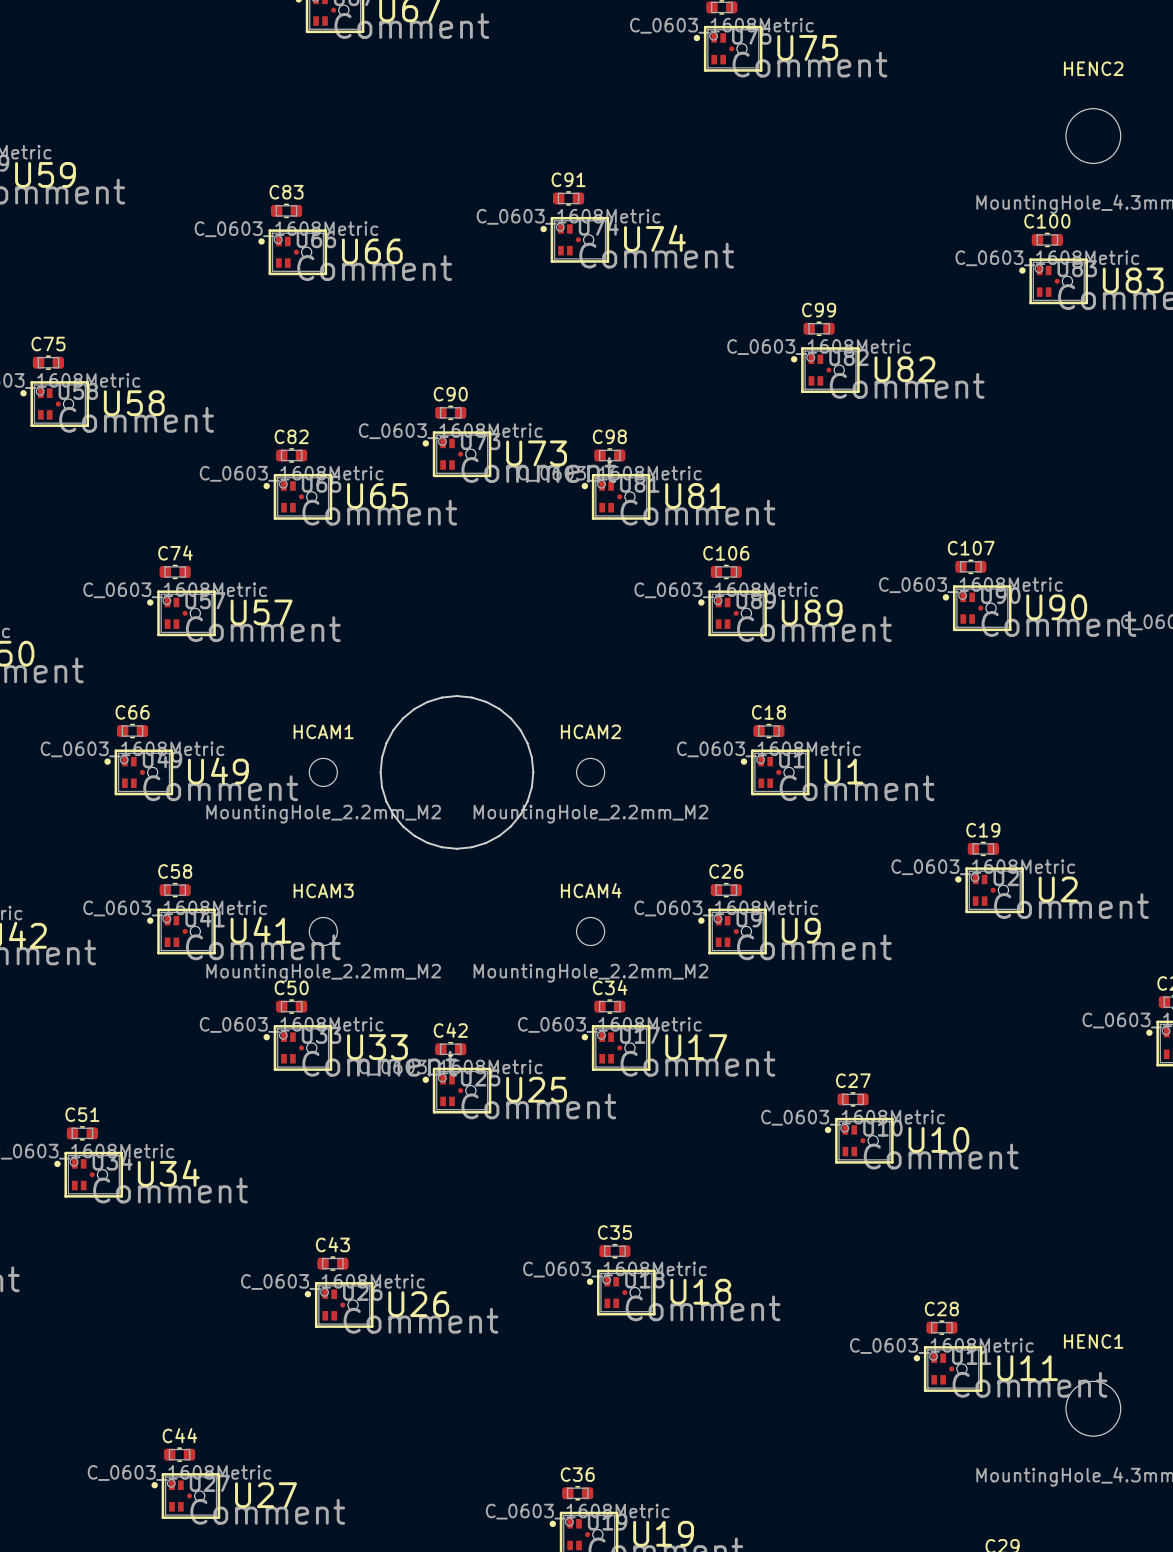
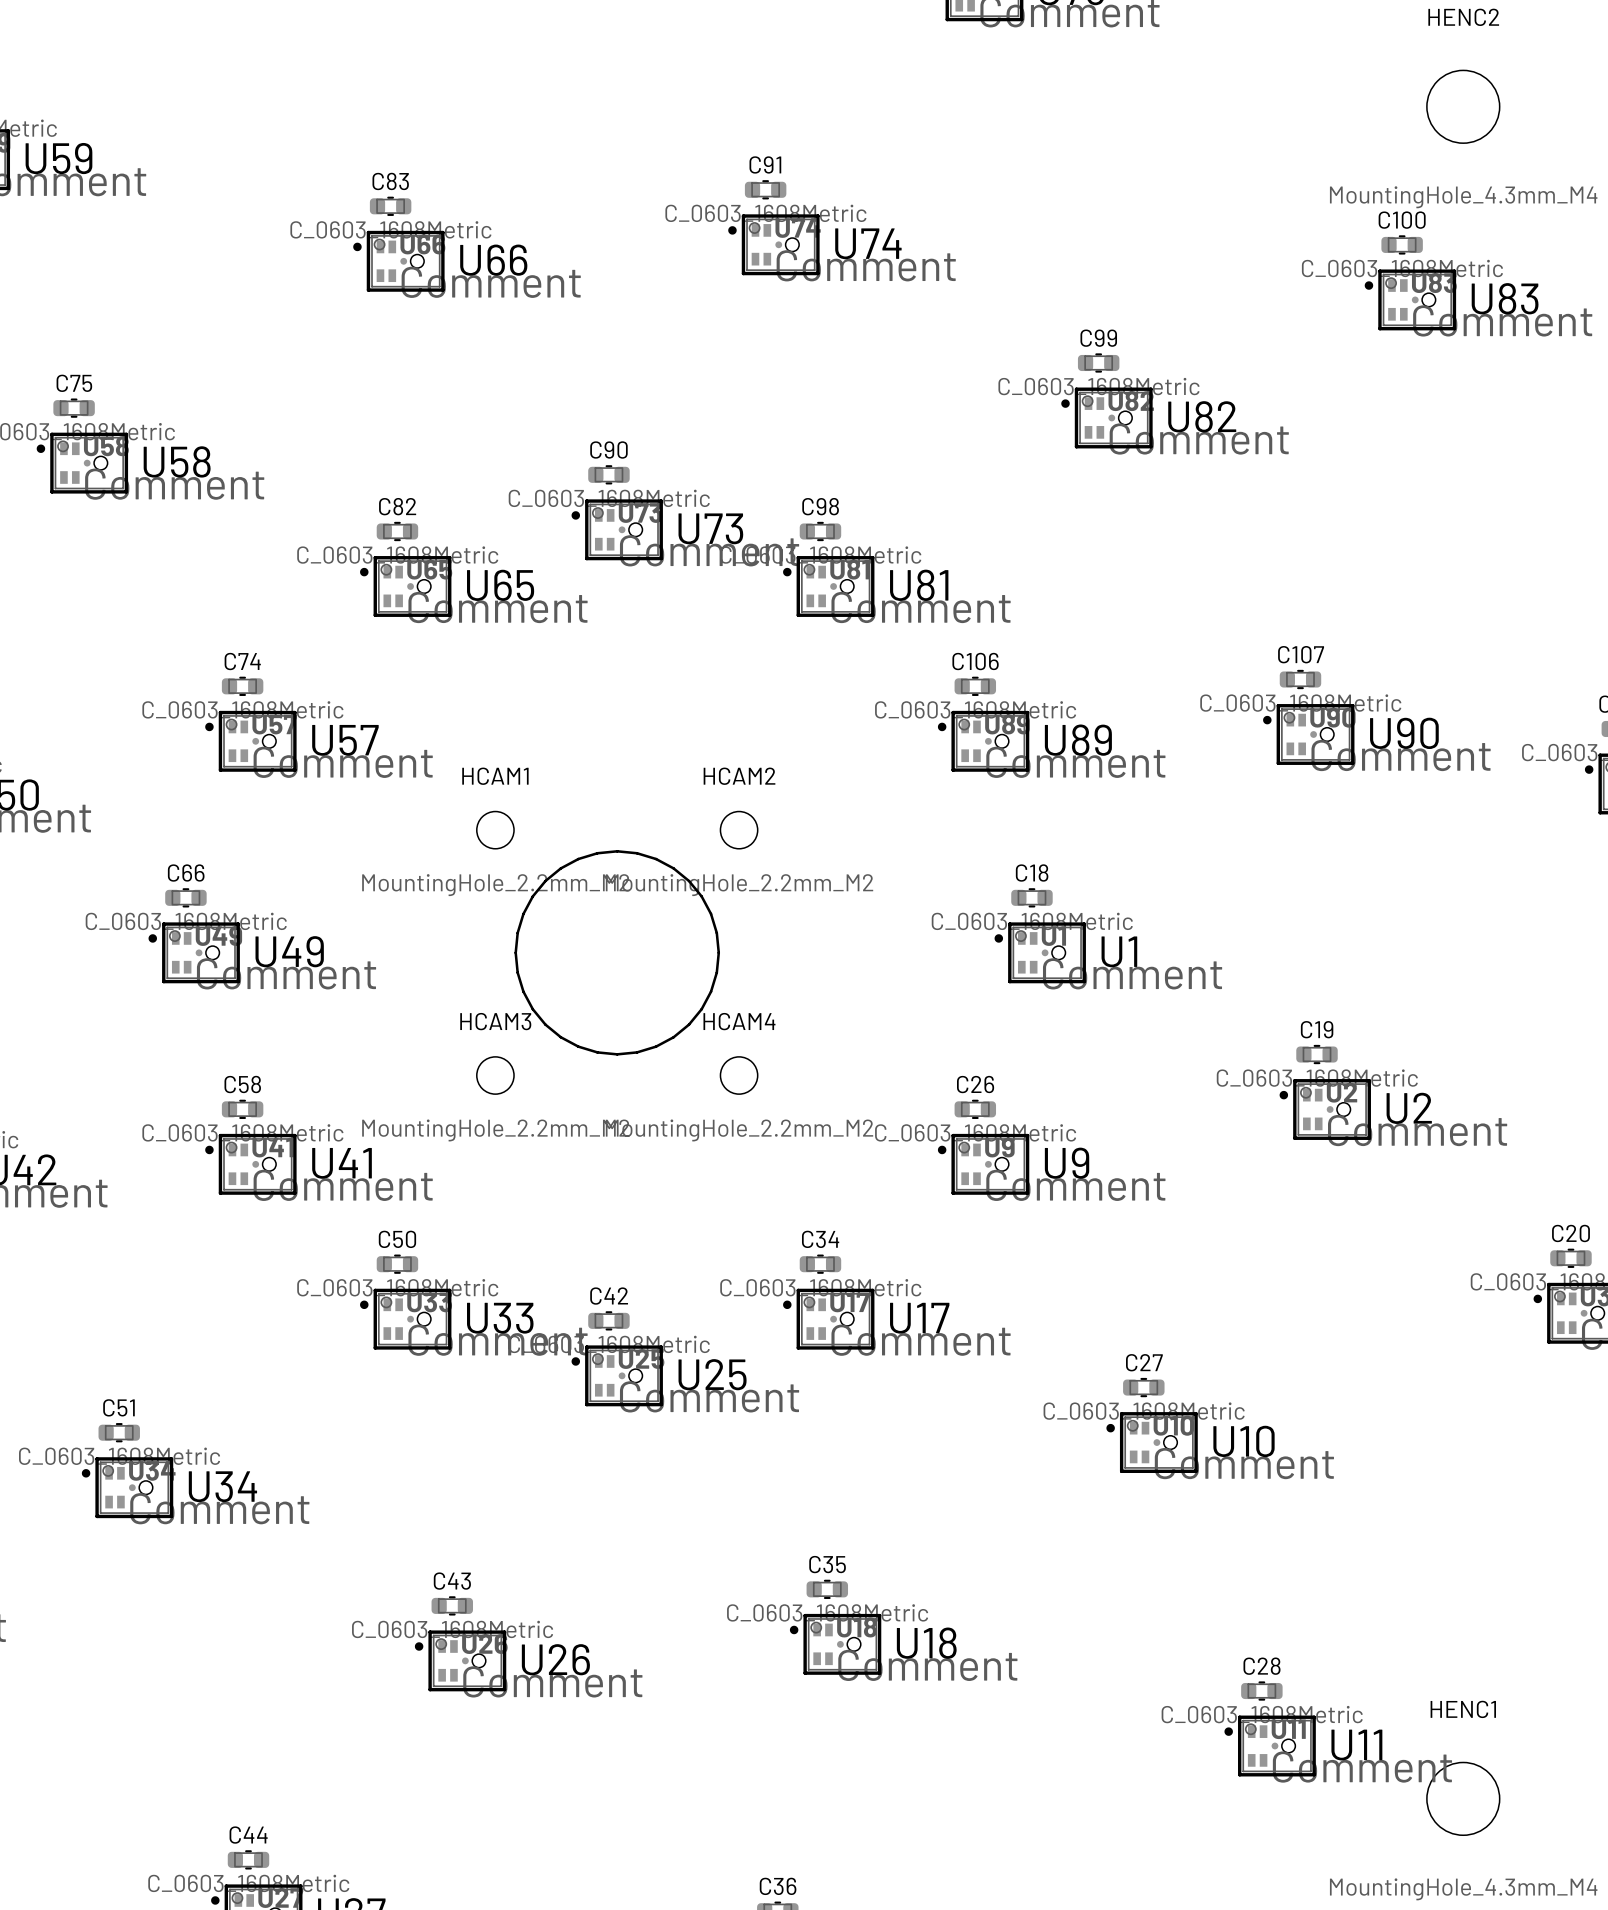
HCAM1 position: (323, 772) -> (495, 830)
HCAM2 position: (590, 772) -> (739, 830)
HCAM3 position: (323, 931) -> (495, 1075)
HCAM4 position: (590, 931) -> (739, 1075)

